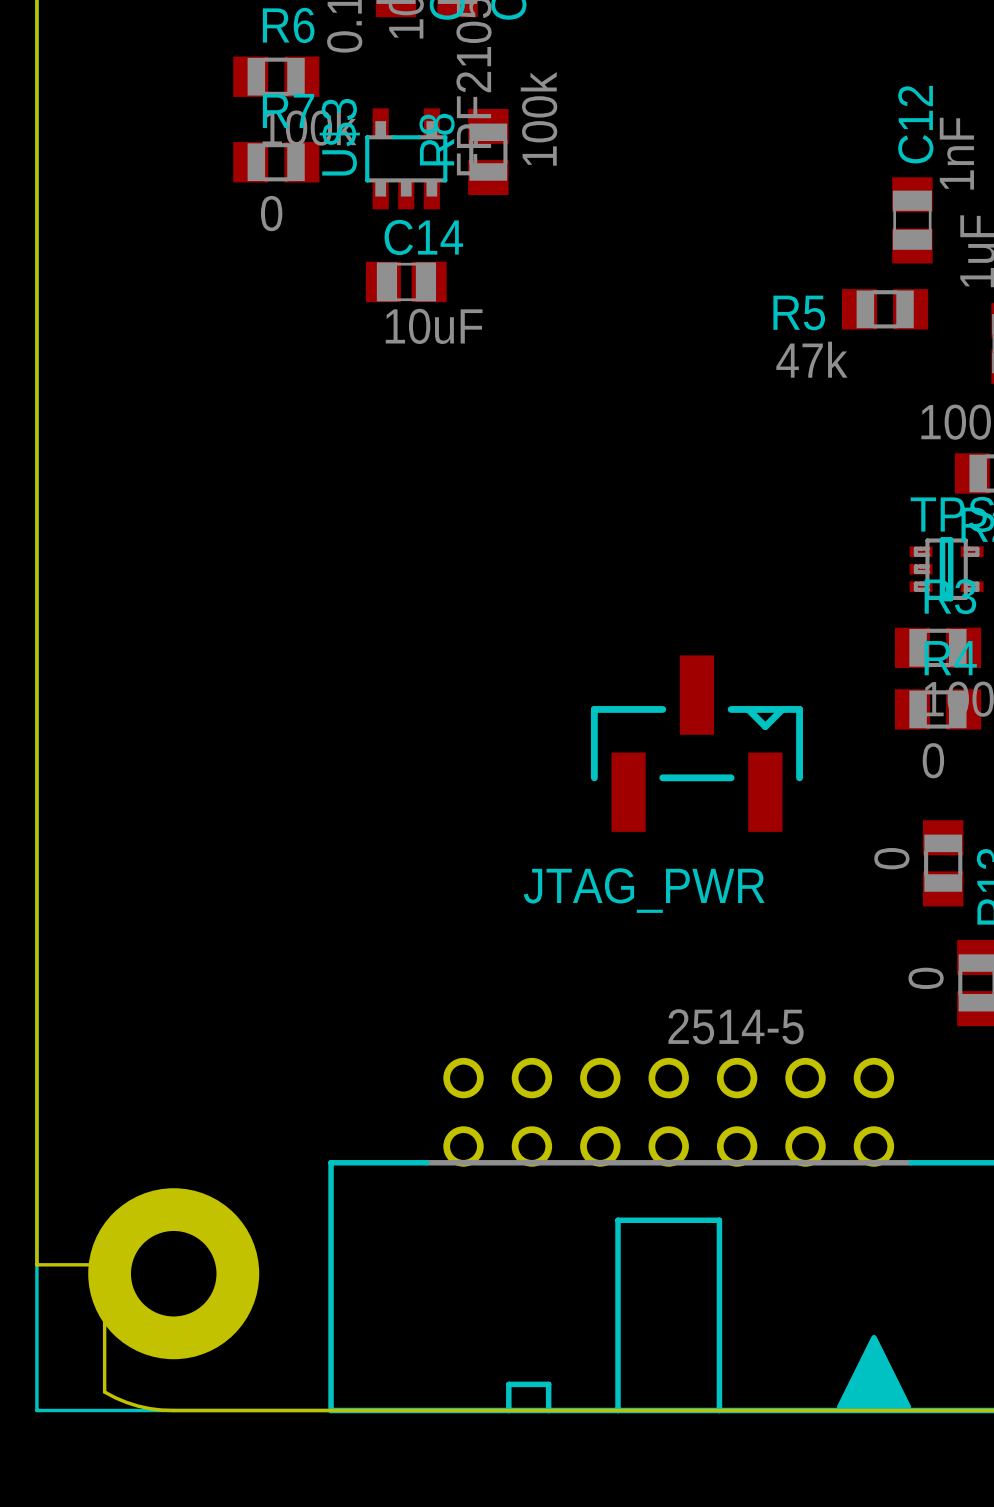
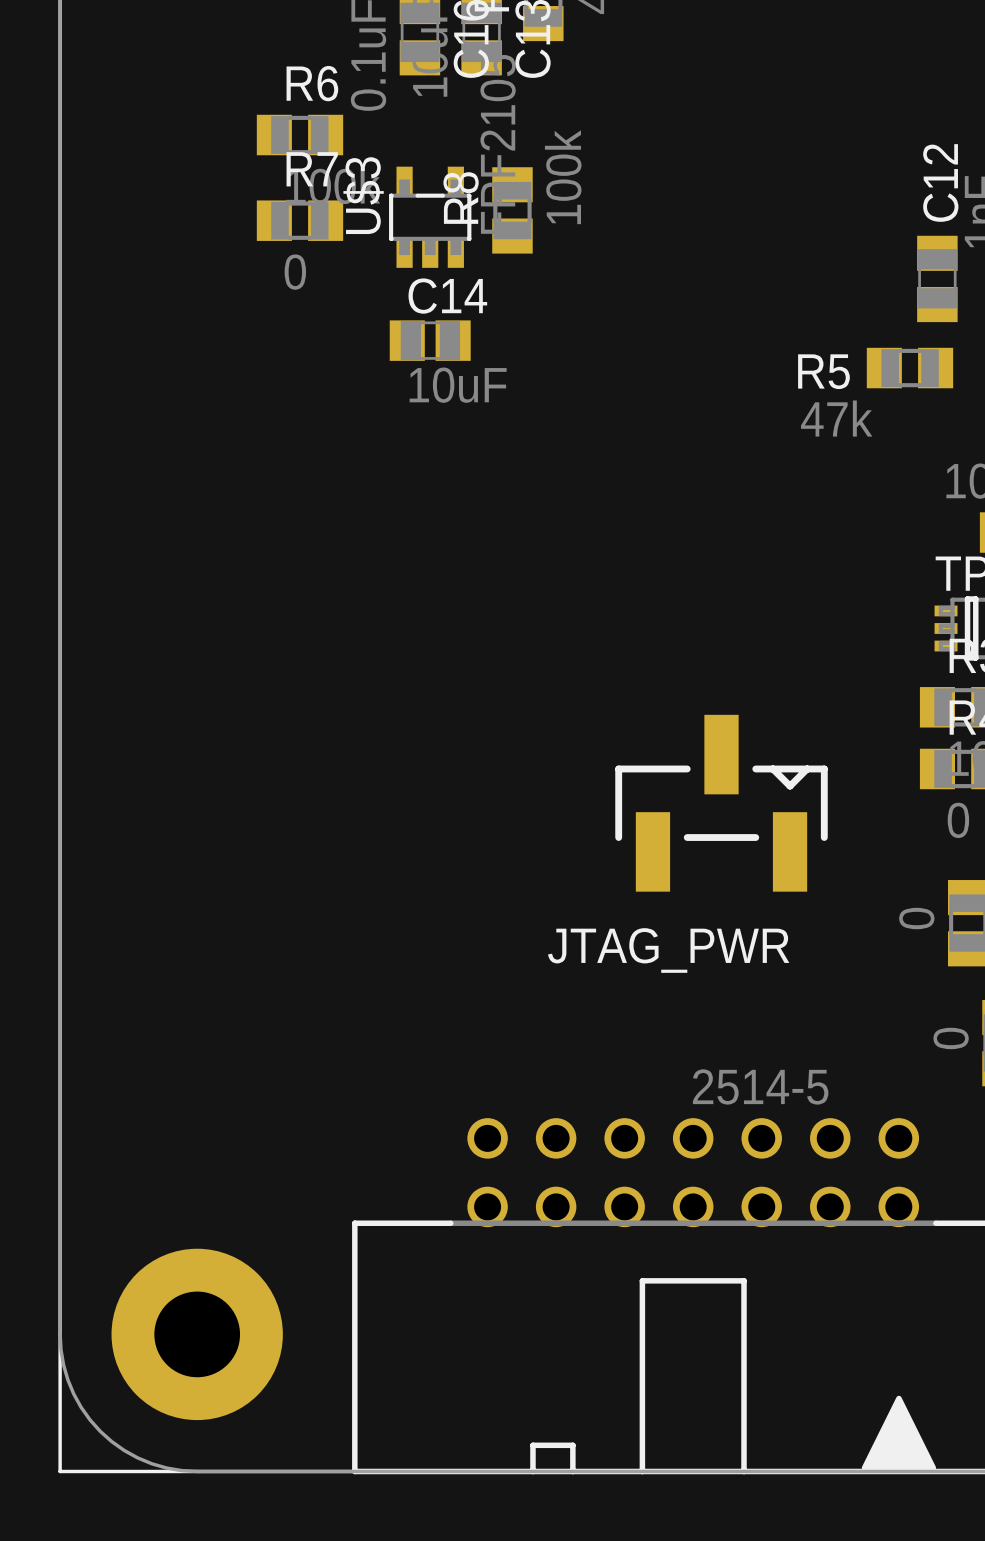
board edge: (36, 1264) (104, 1264) (104, 1392) (137, 1406) (173, 1410) -> (60, 1325) (60, 1349) (67, 1379) (81, 1407) (100, 1431) (124, 1450) (137, 1457) (166, 1468) (197, 1471)

